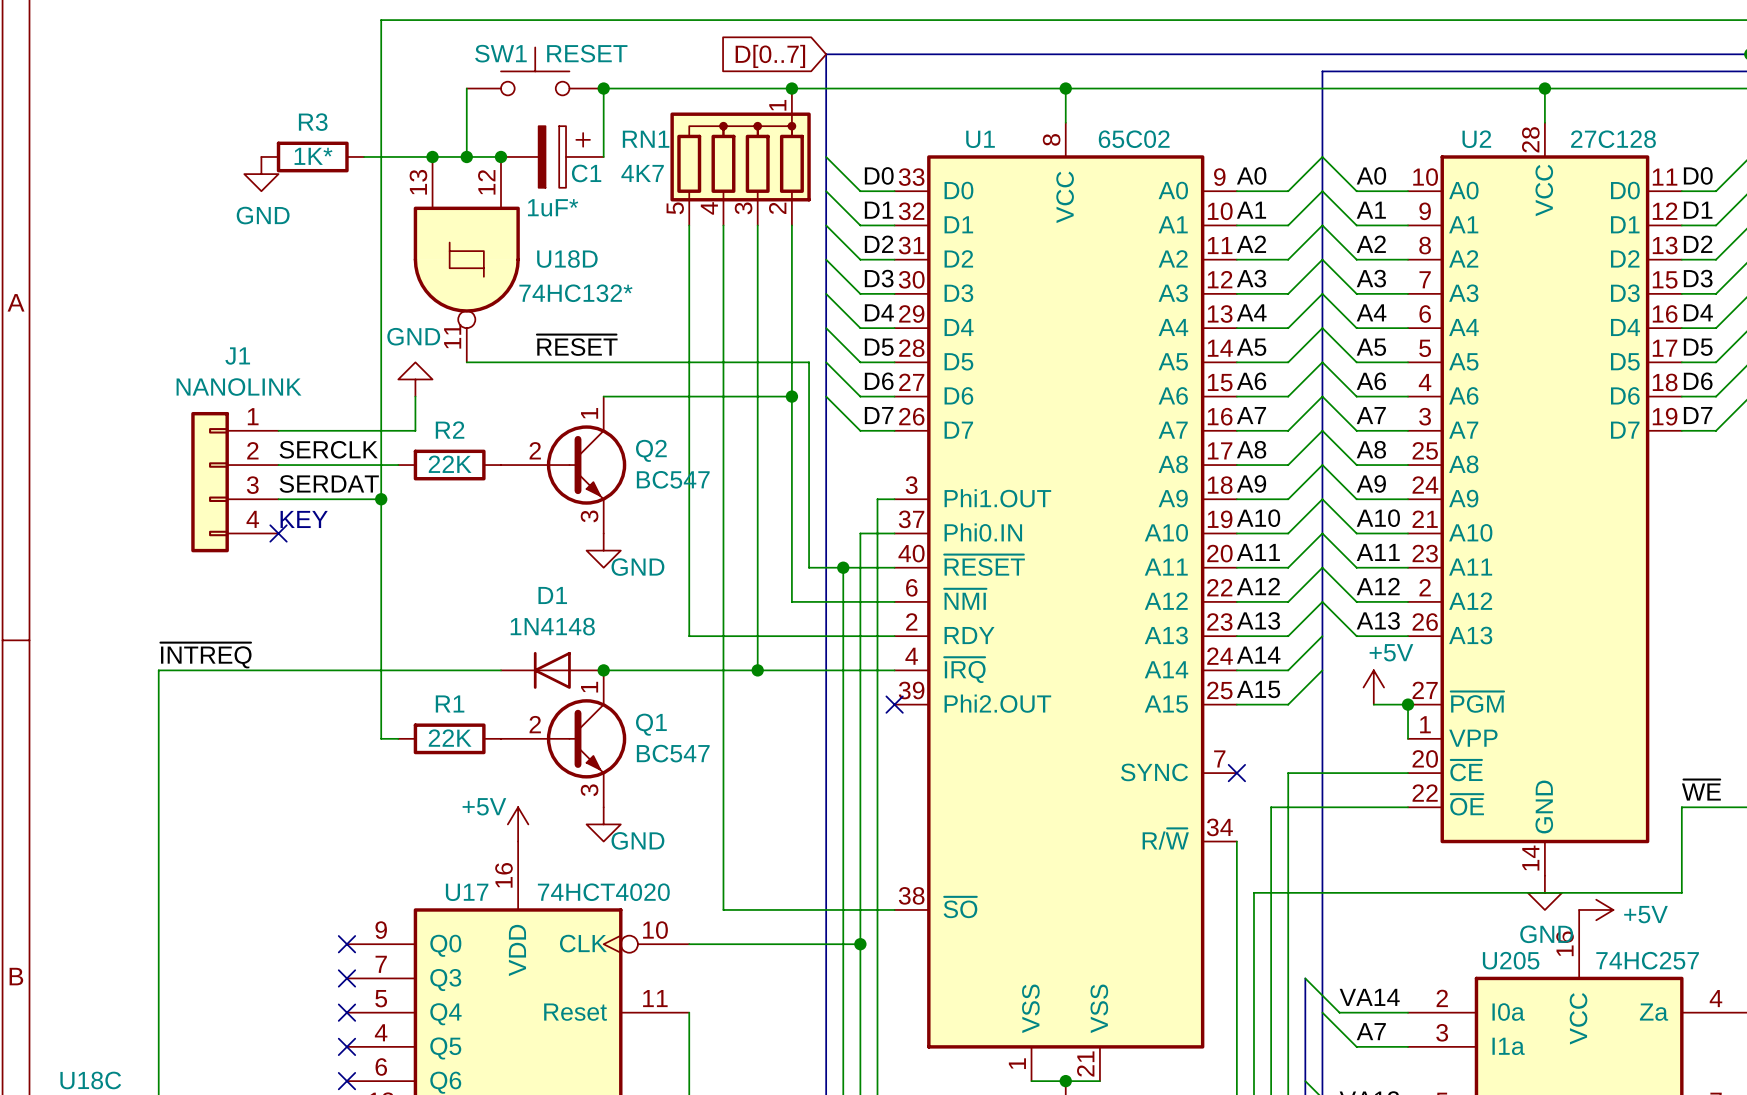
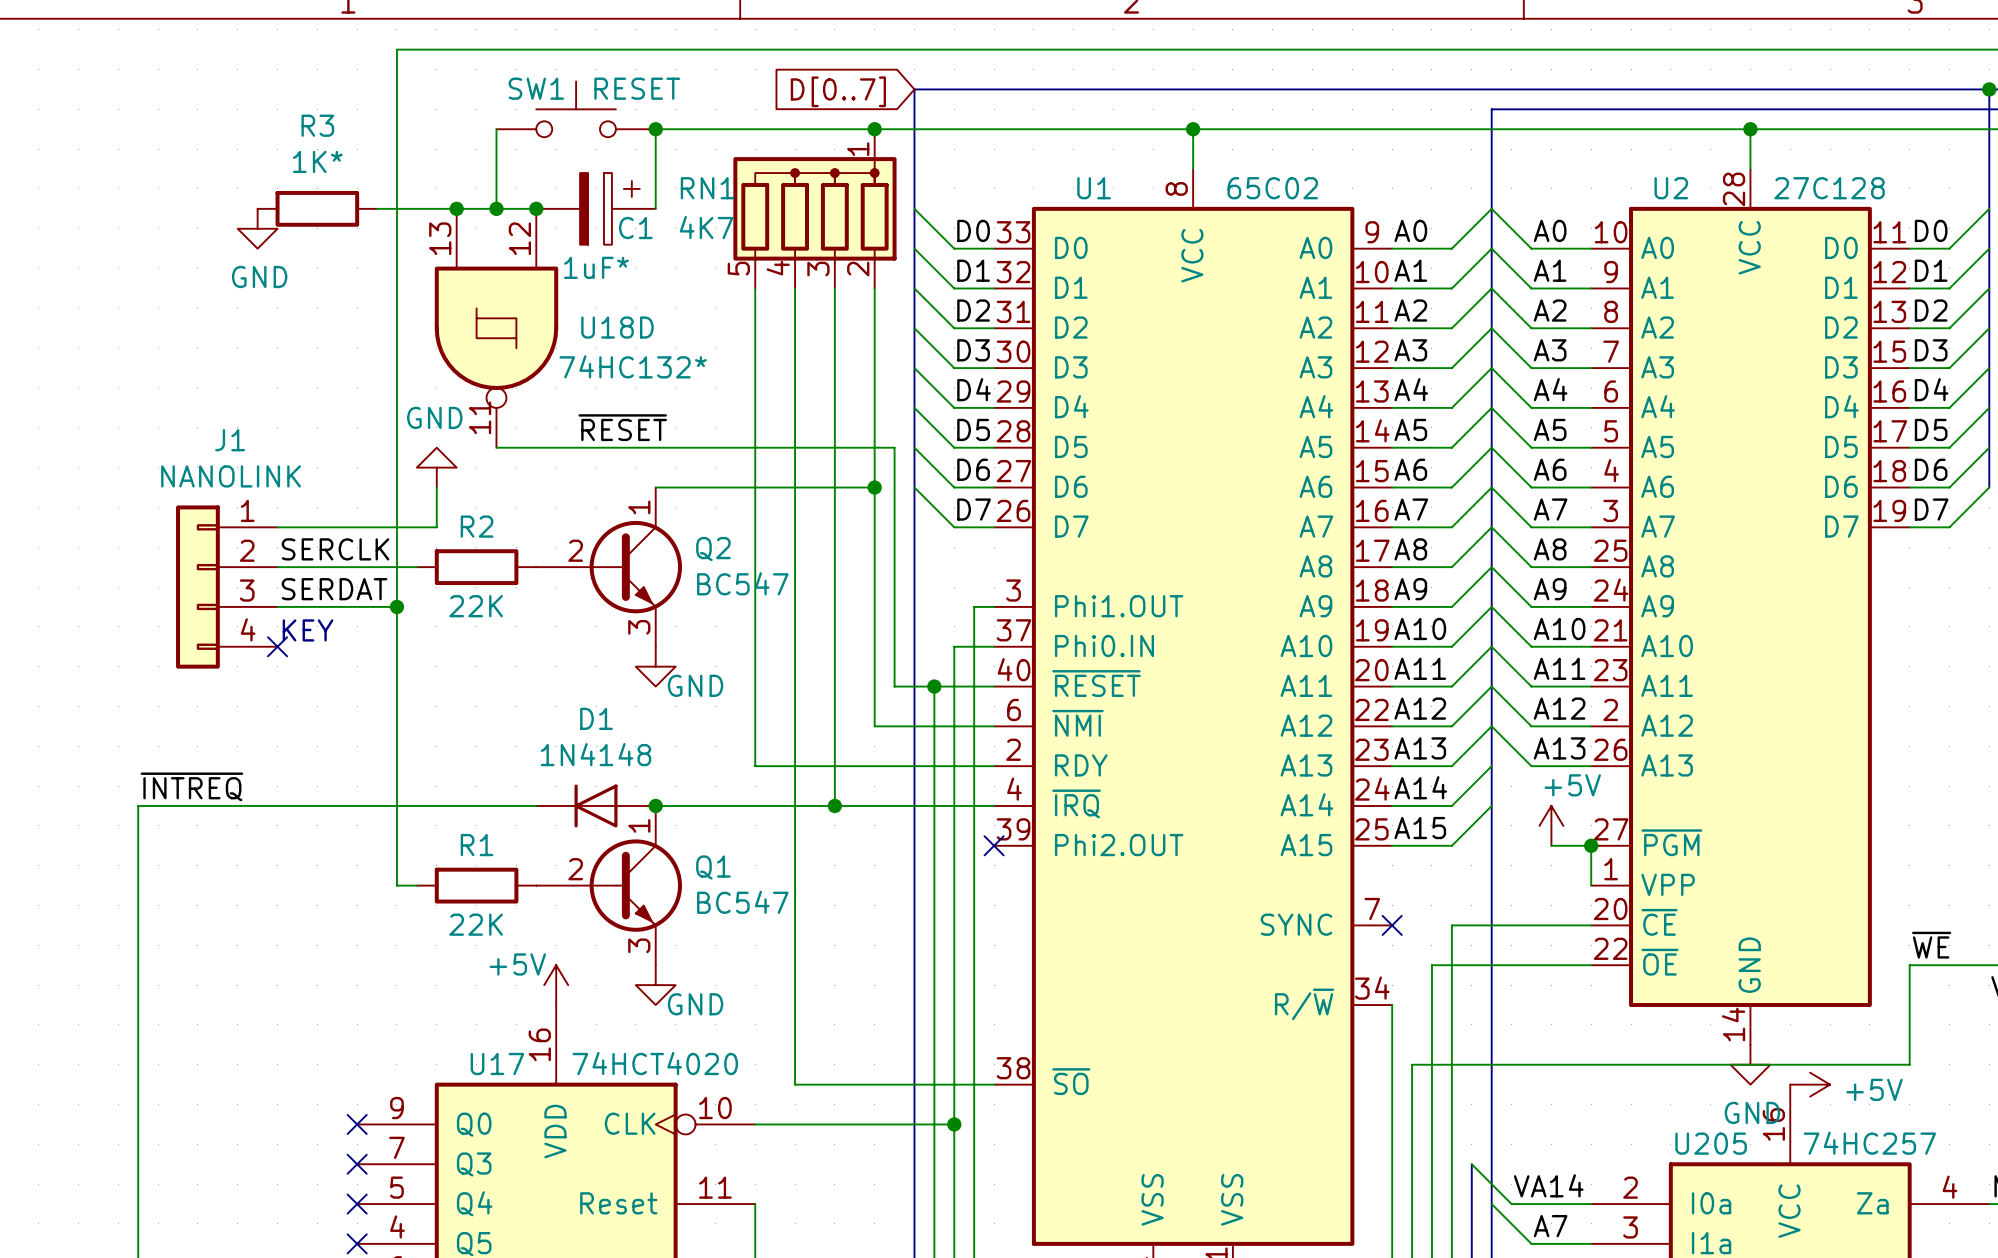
R3 name position: R3 (313, 122) -> R3 (317, 125)
R3 value position: 1K* (313, 156) -> 1K* (317, 161)
R2 value position: 22K (450, 464) -> 22K (476, 606)
R1 value position: 22K (450, 738) -> 22K (476, 924)

